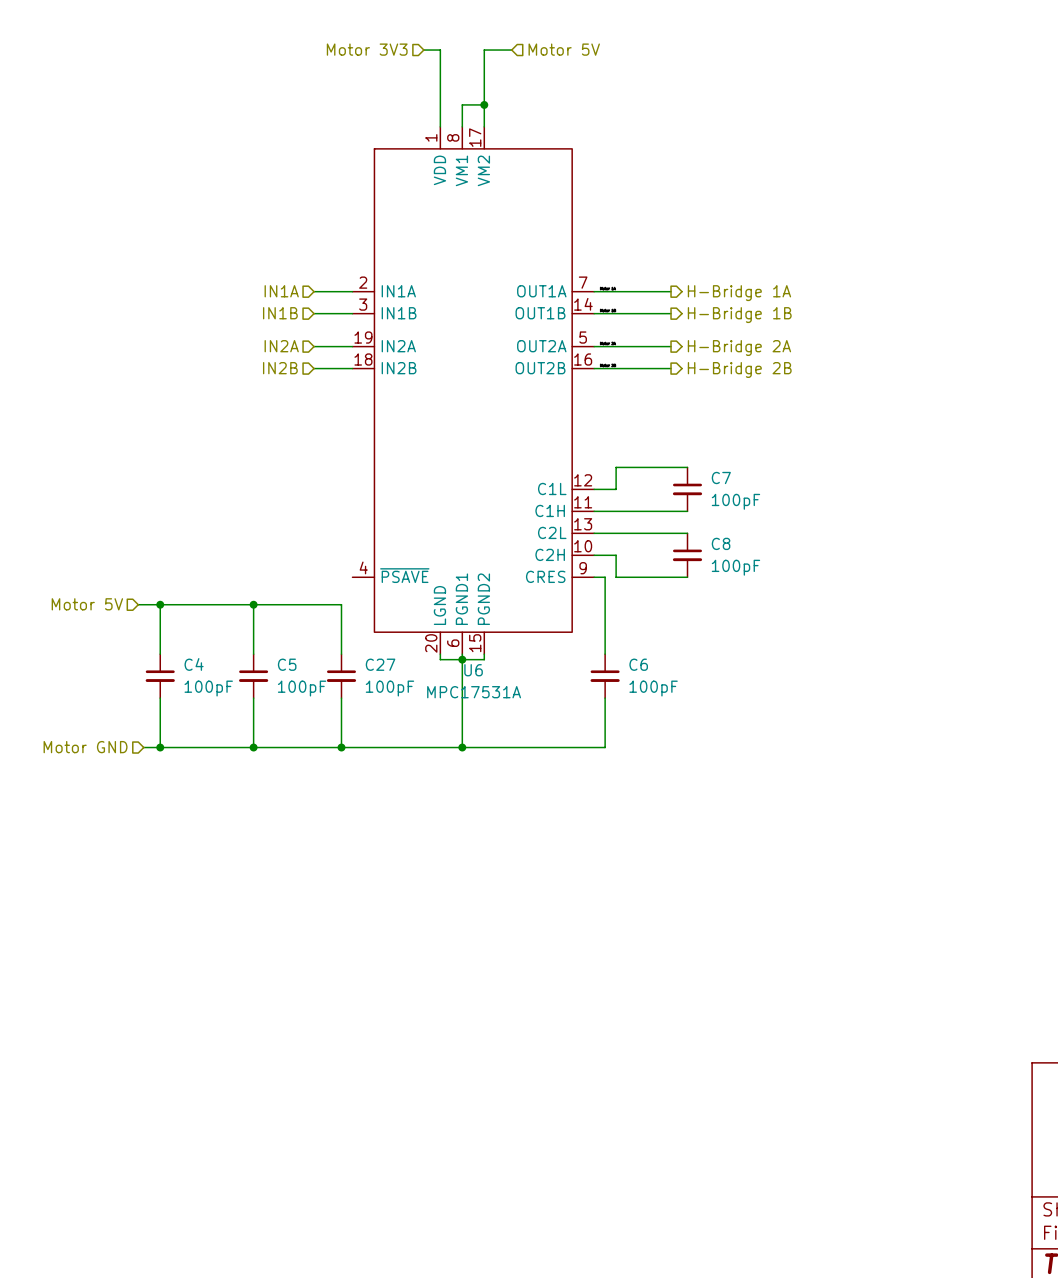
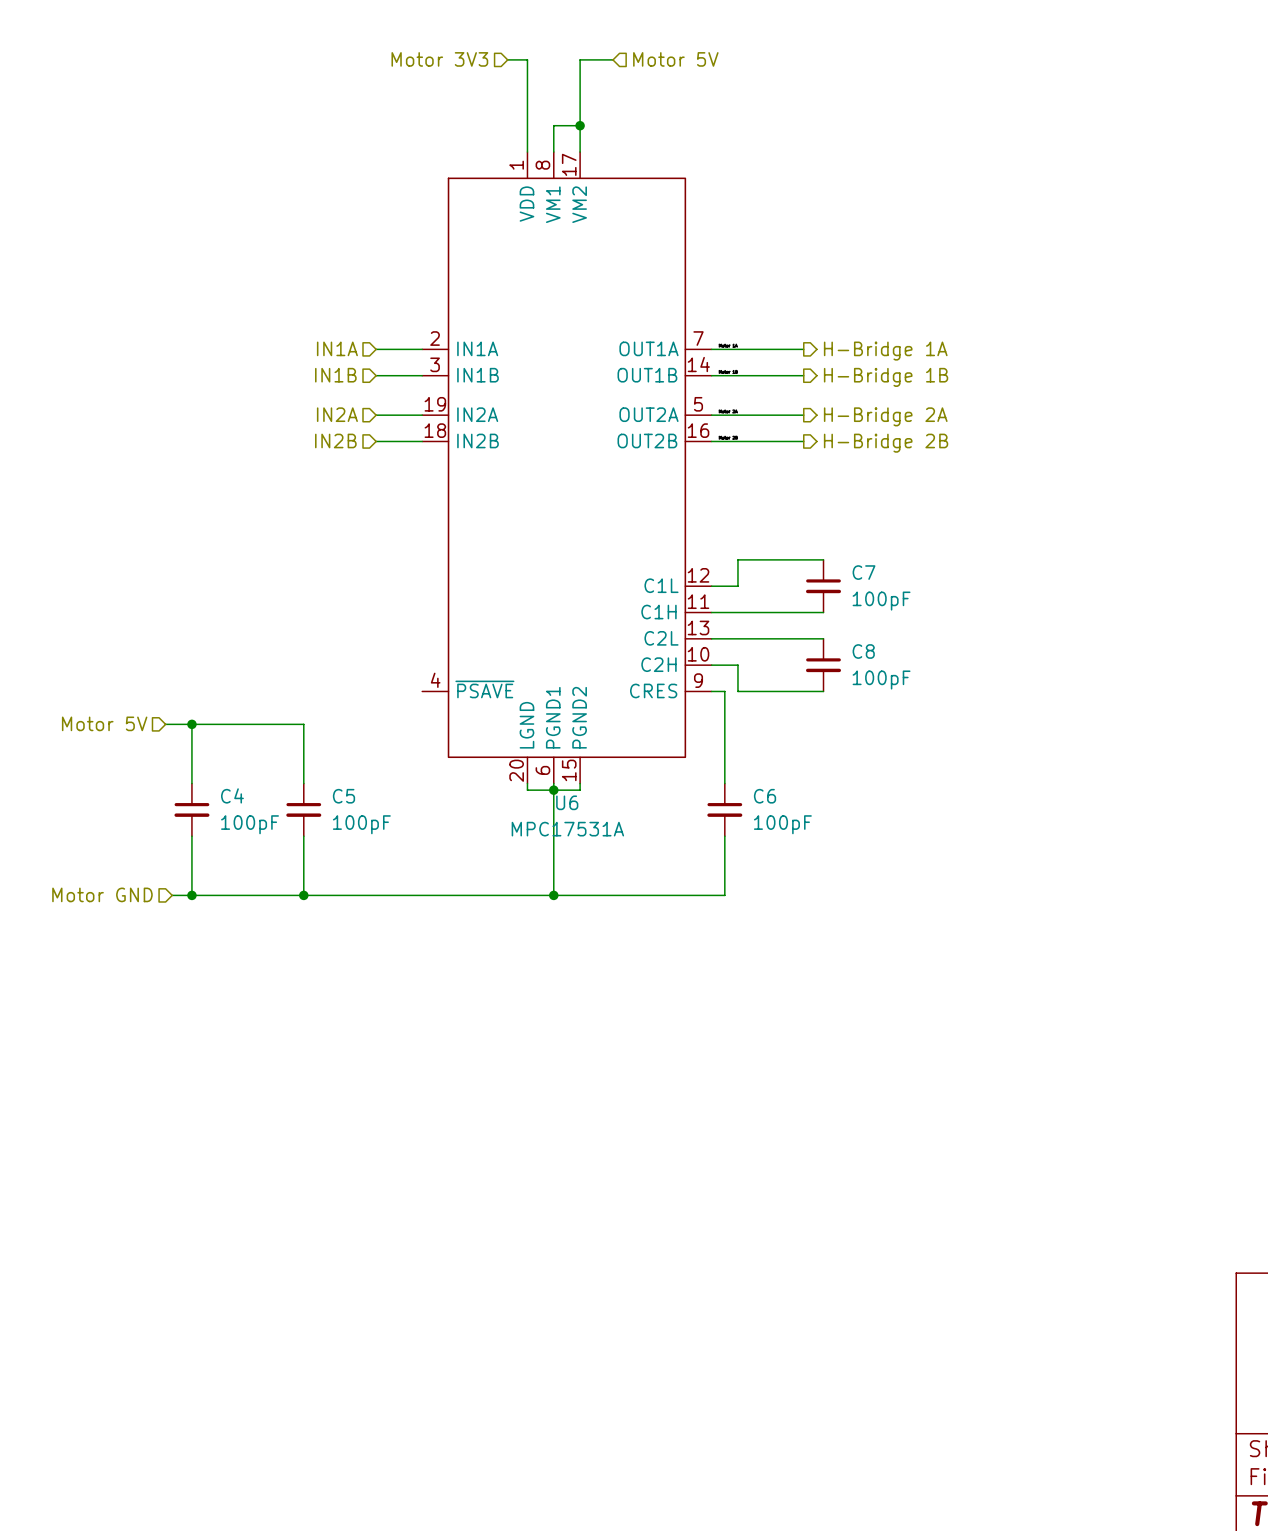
wire: (253, 604) (341, 604) (341, 654) -> none
junction: (253, 604) -> none
C27: 100pF (341, 676) -> none
wire: (341, 698) (341, 747) -> none
junction: (341, 747) -> none

